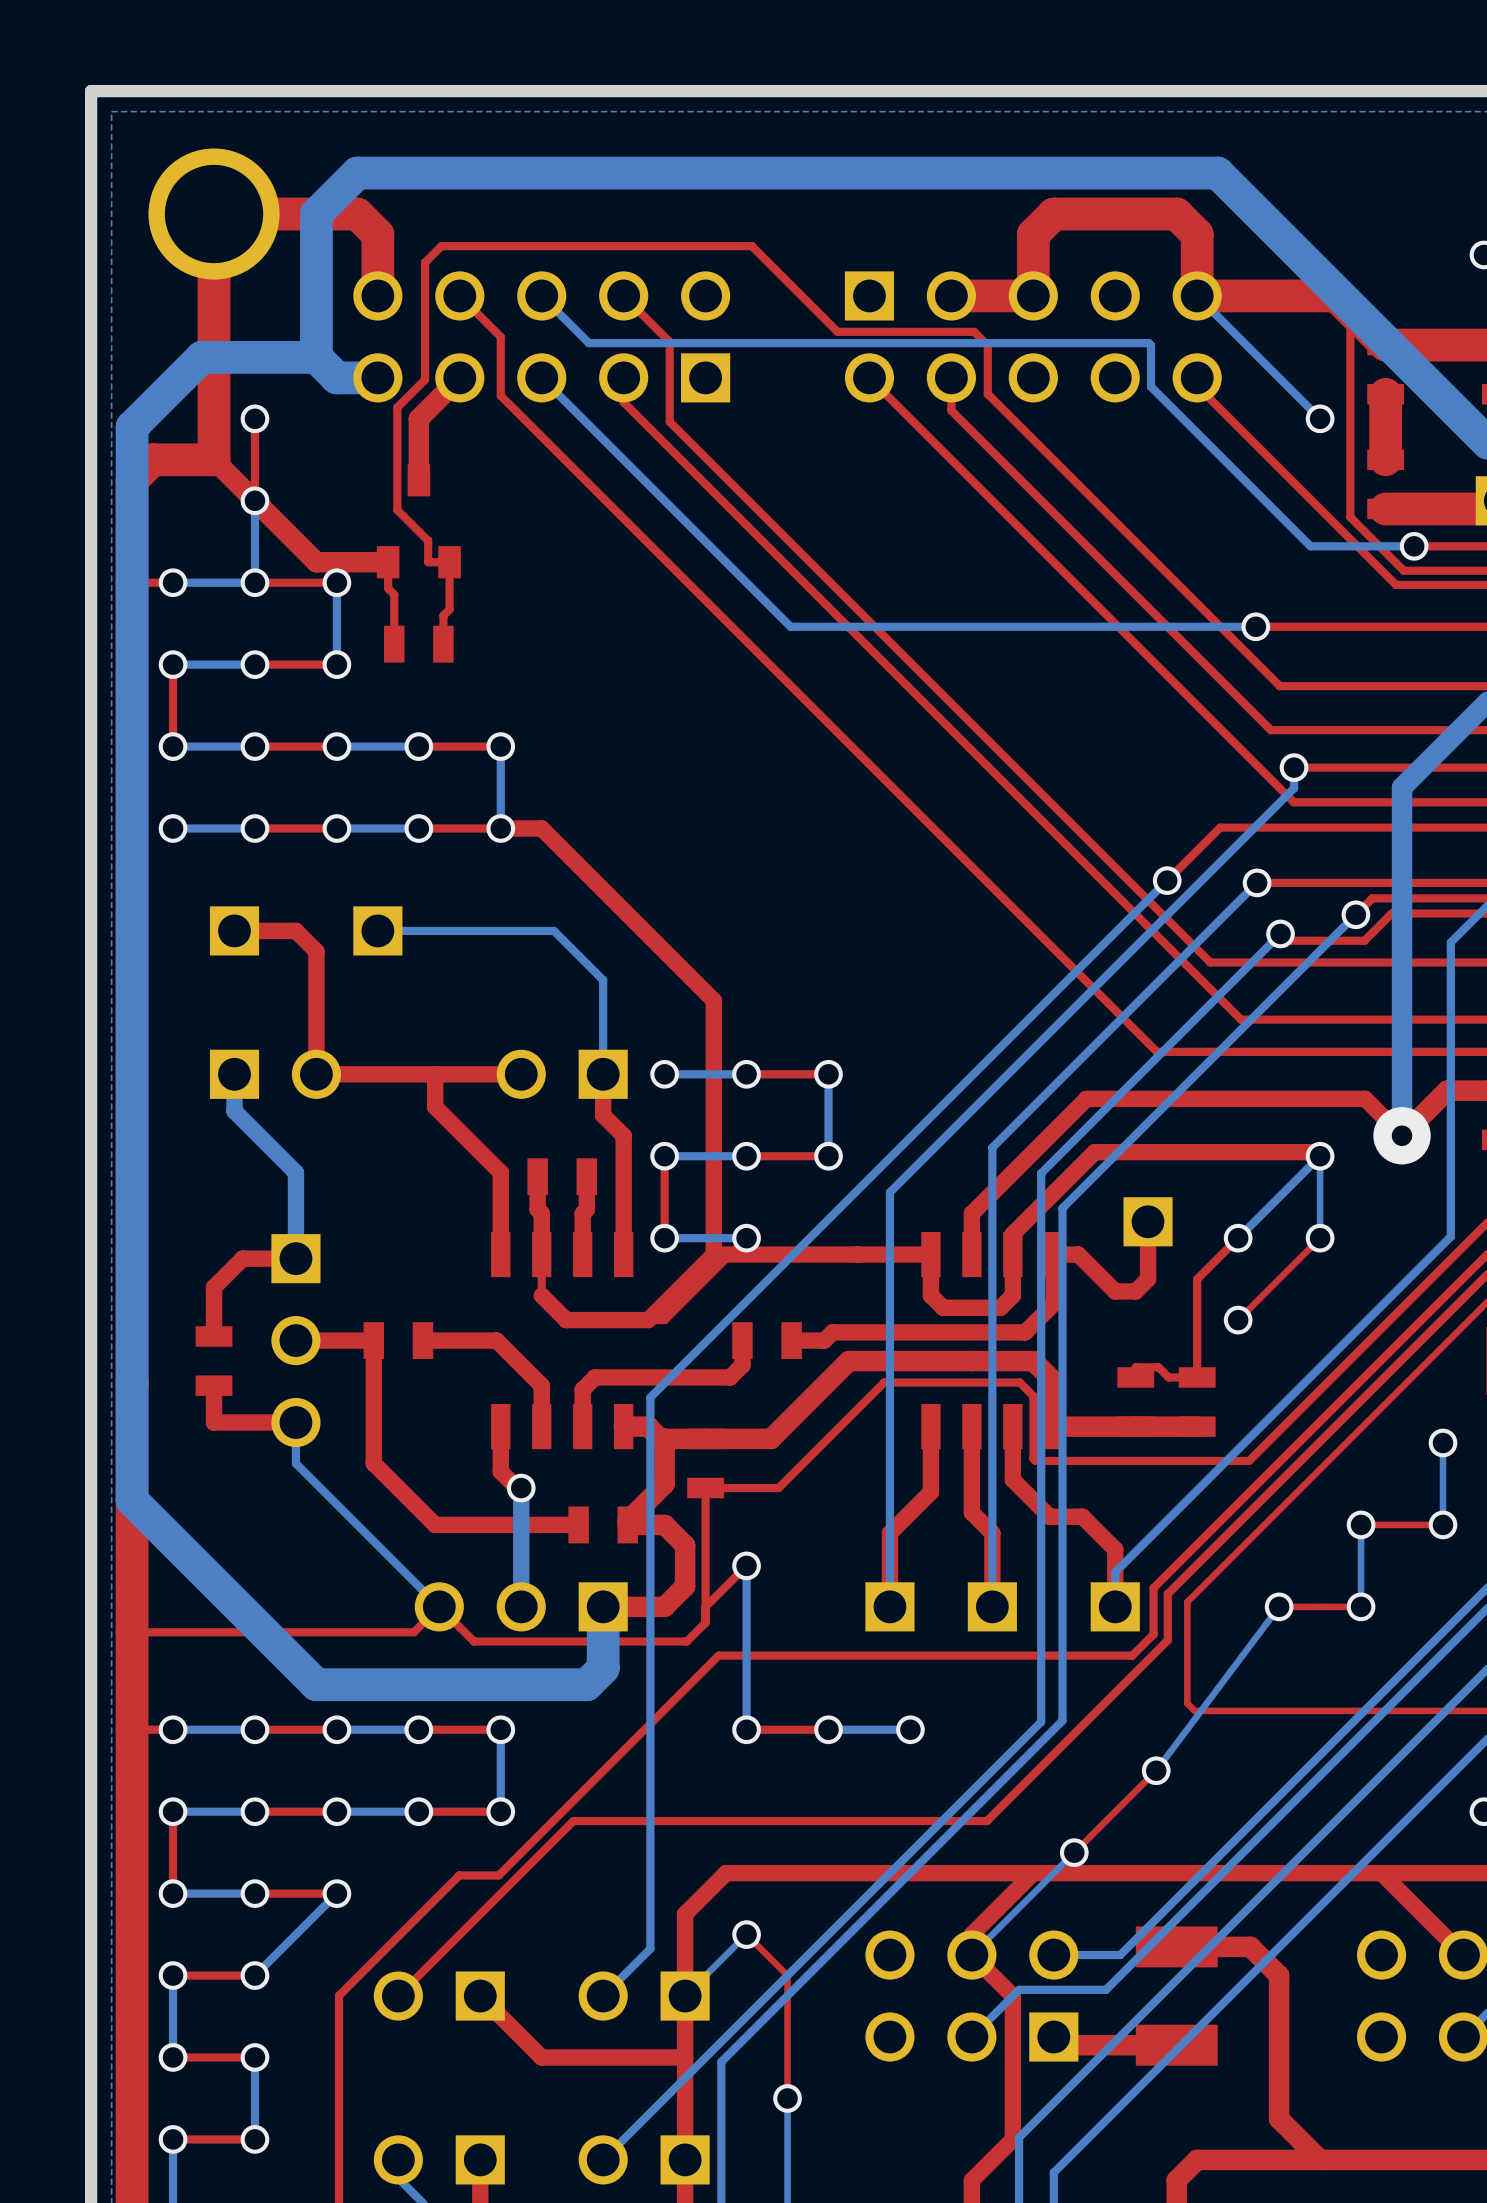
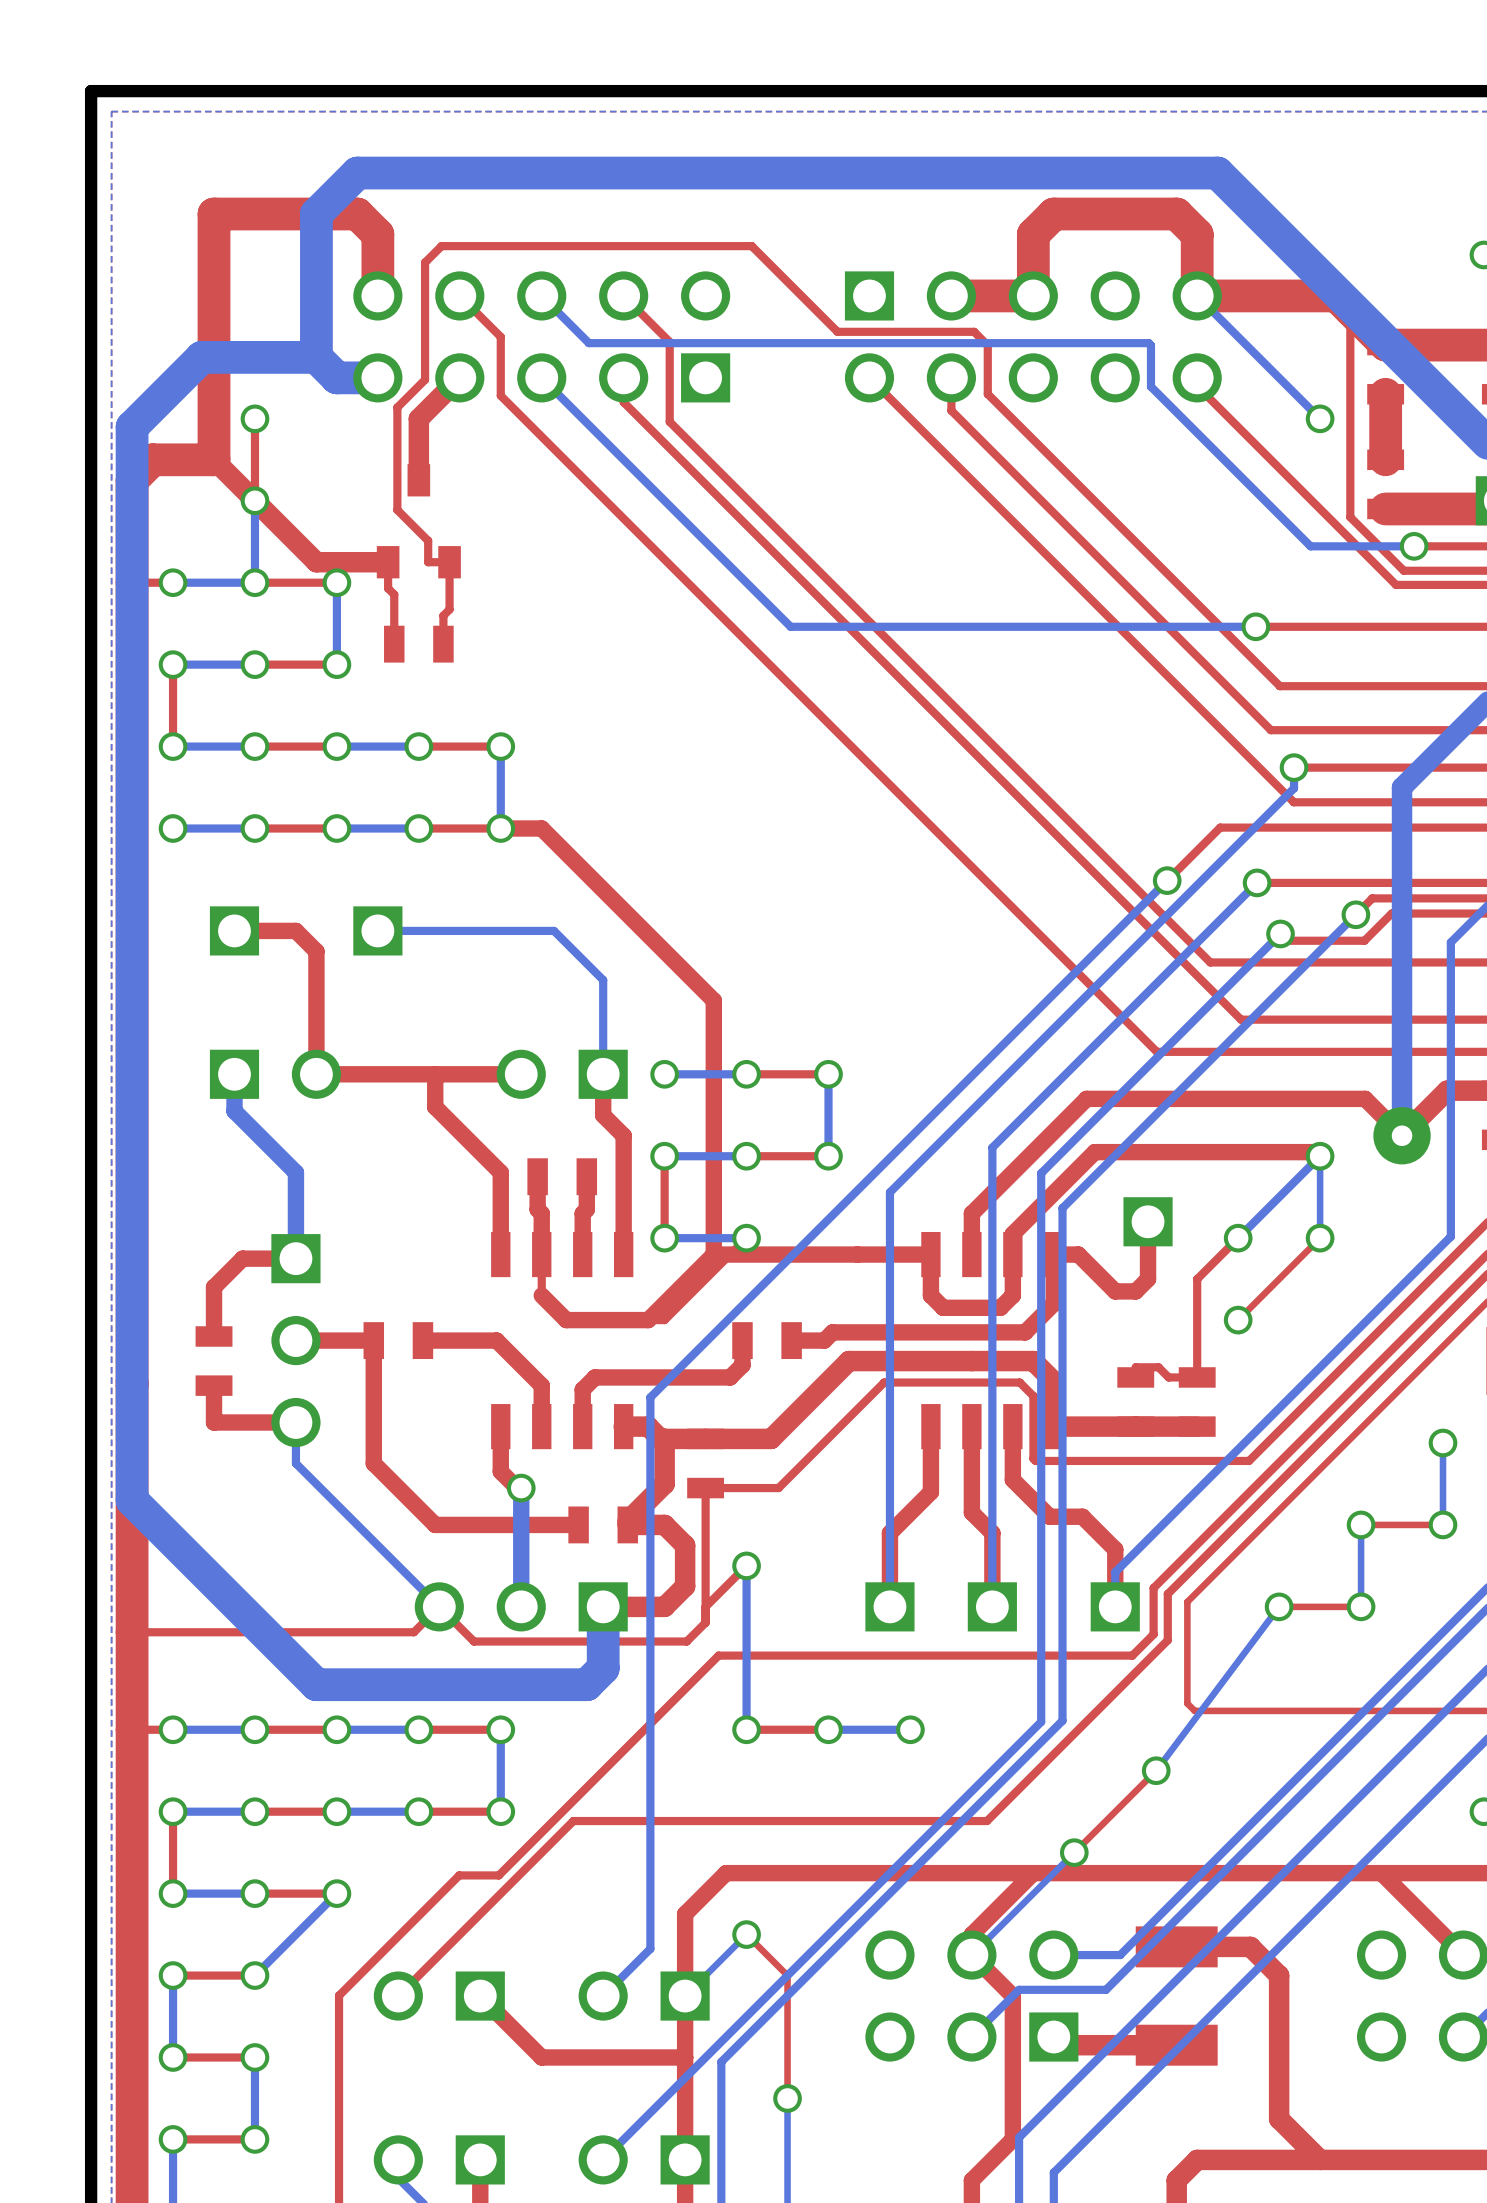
part: (214, 214) -> none

